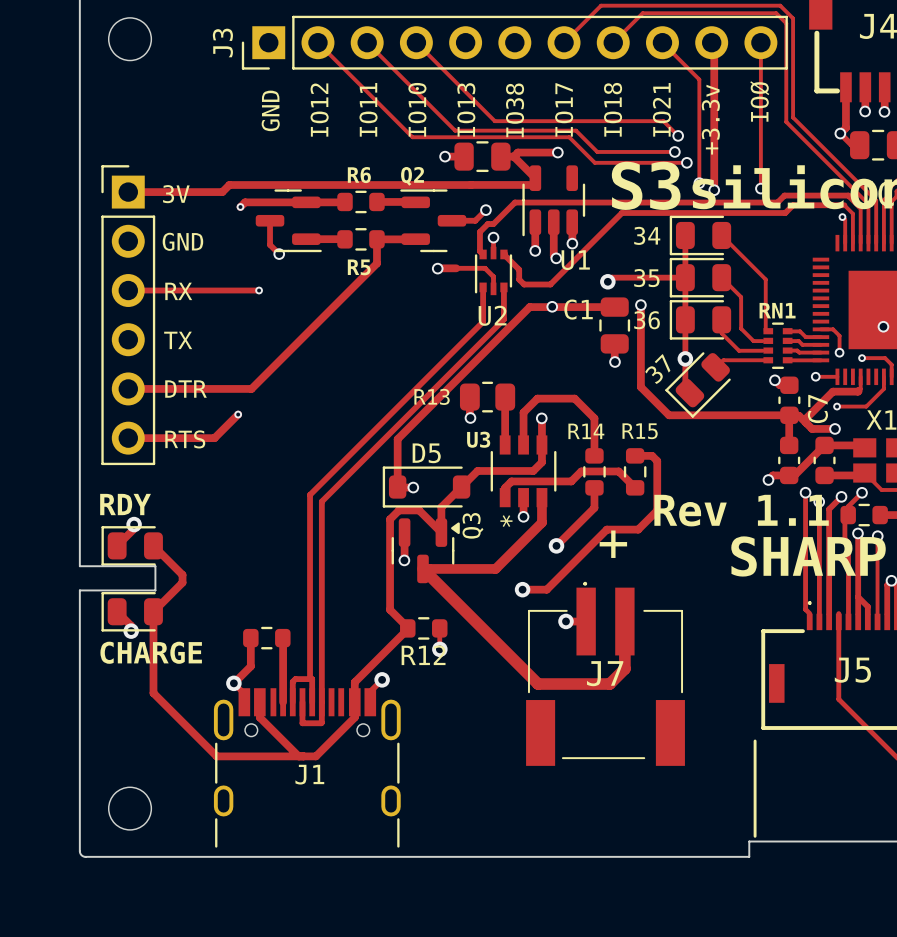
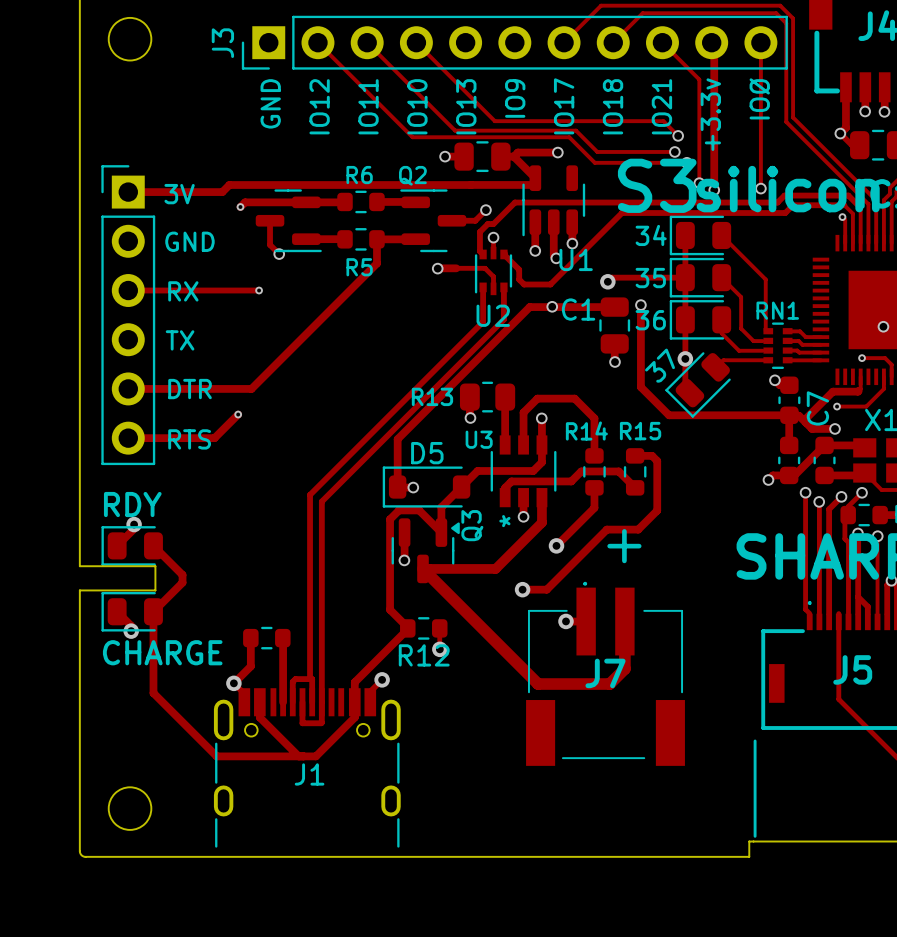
text: IO38 (515, 110) -> IO9 (515, 98)
track: (820, 329) (833, 329) (839, 335) (839, 352) -> none
via: (839, 352) -> none
track: (815, 376) (837, 376) -> none
via: (815, 376) -> none
text: Rev 1.1 (741, 510) -> none

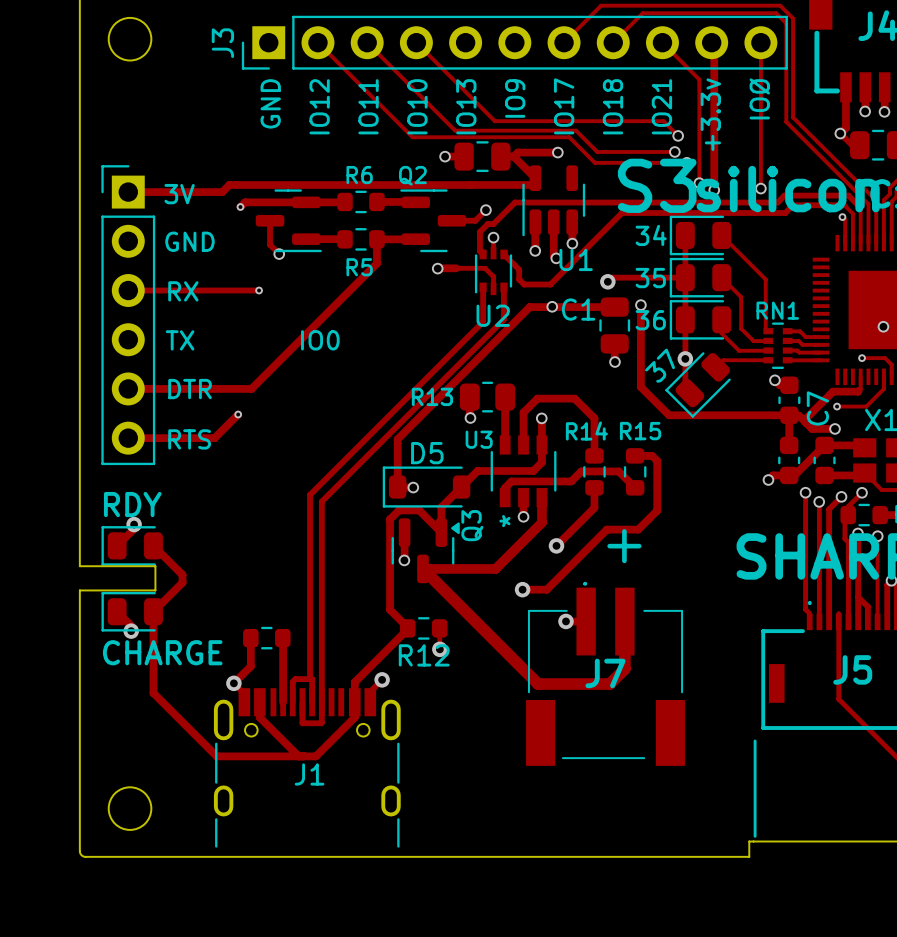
text: none -> IO0 (320, 340)

